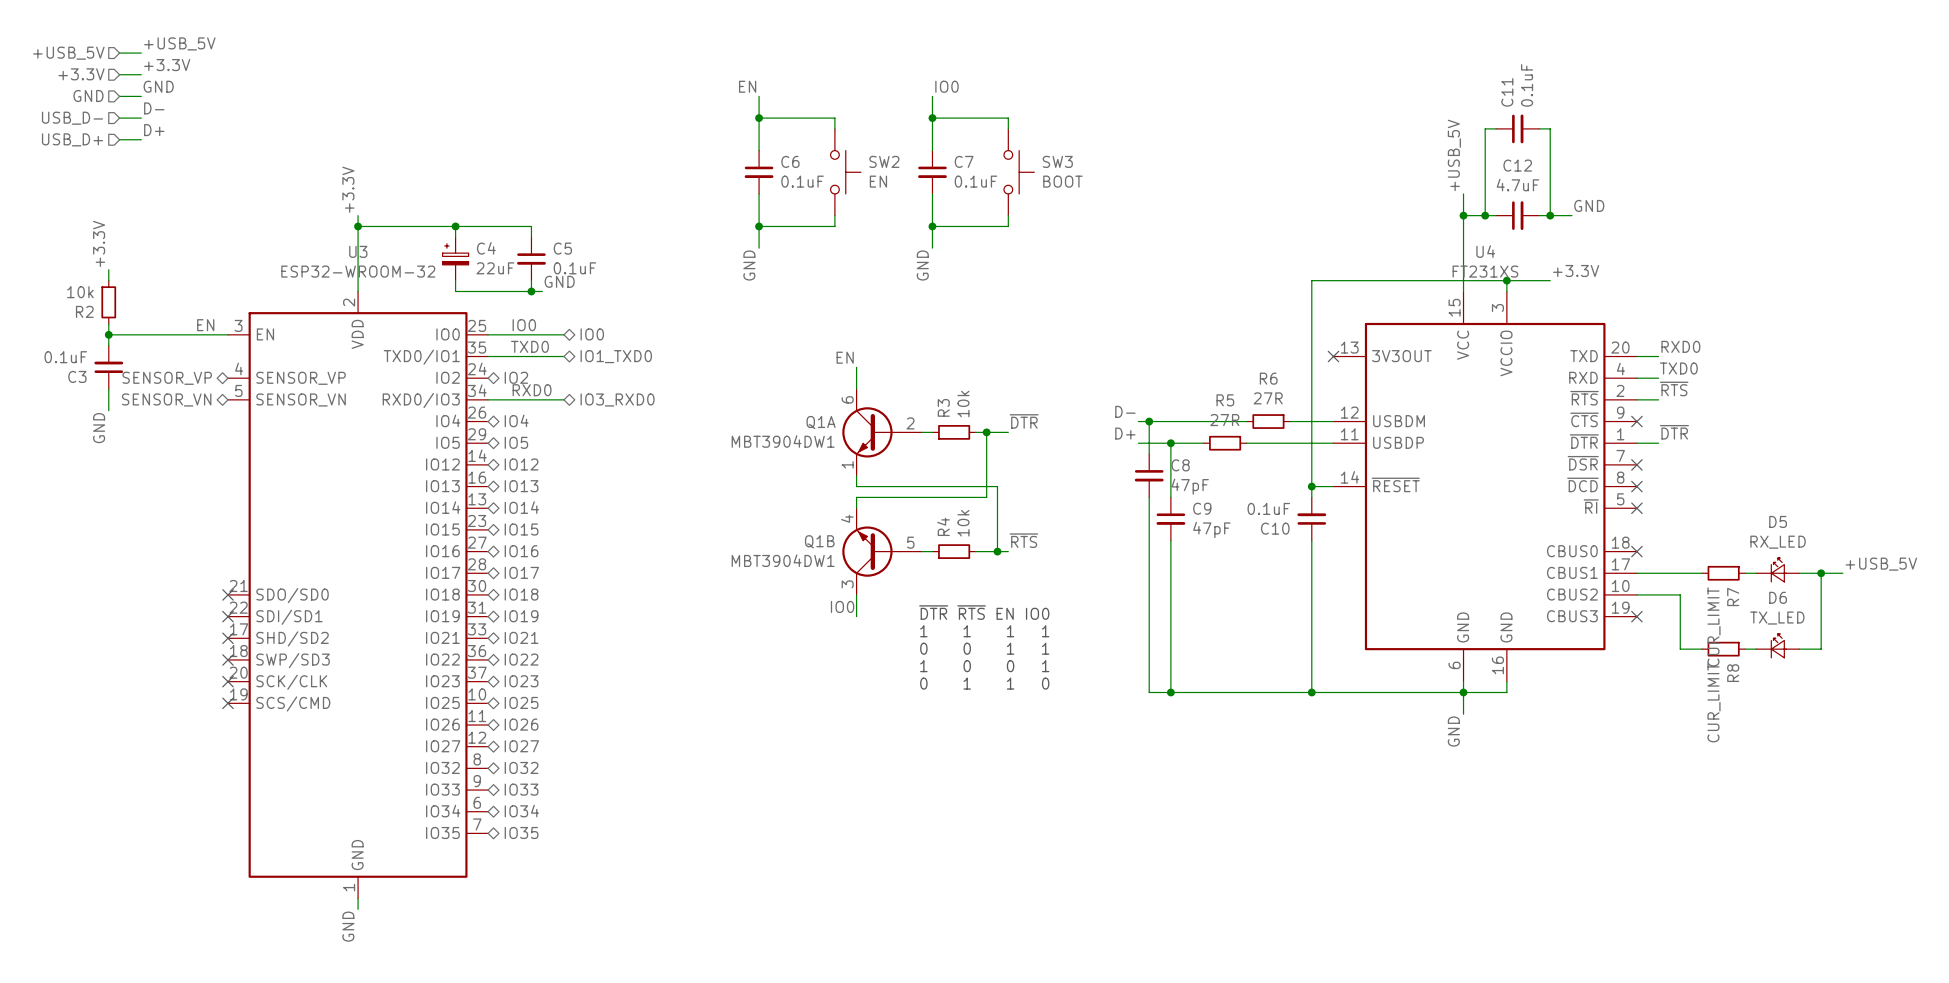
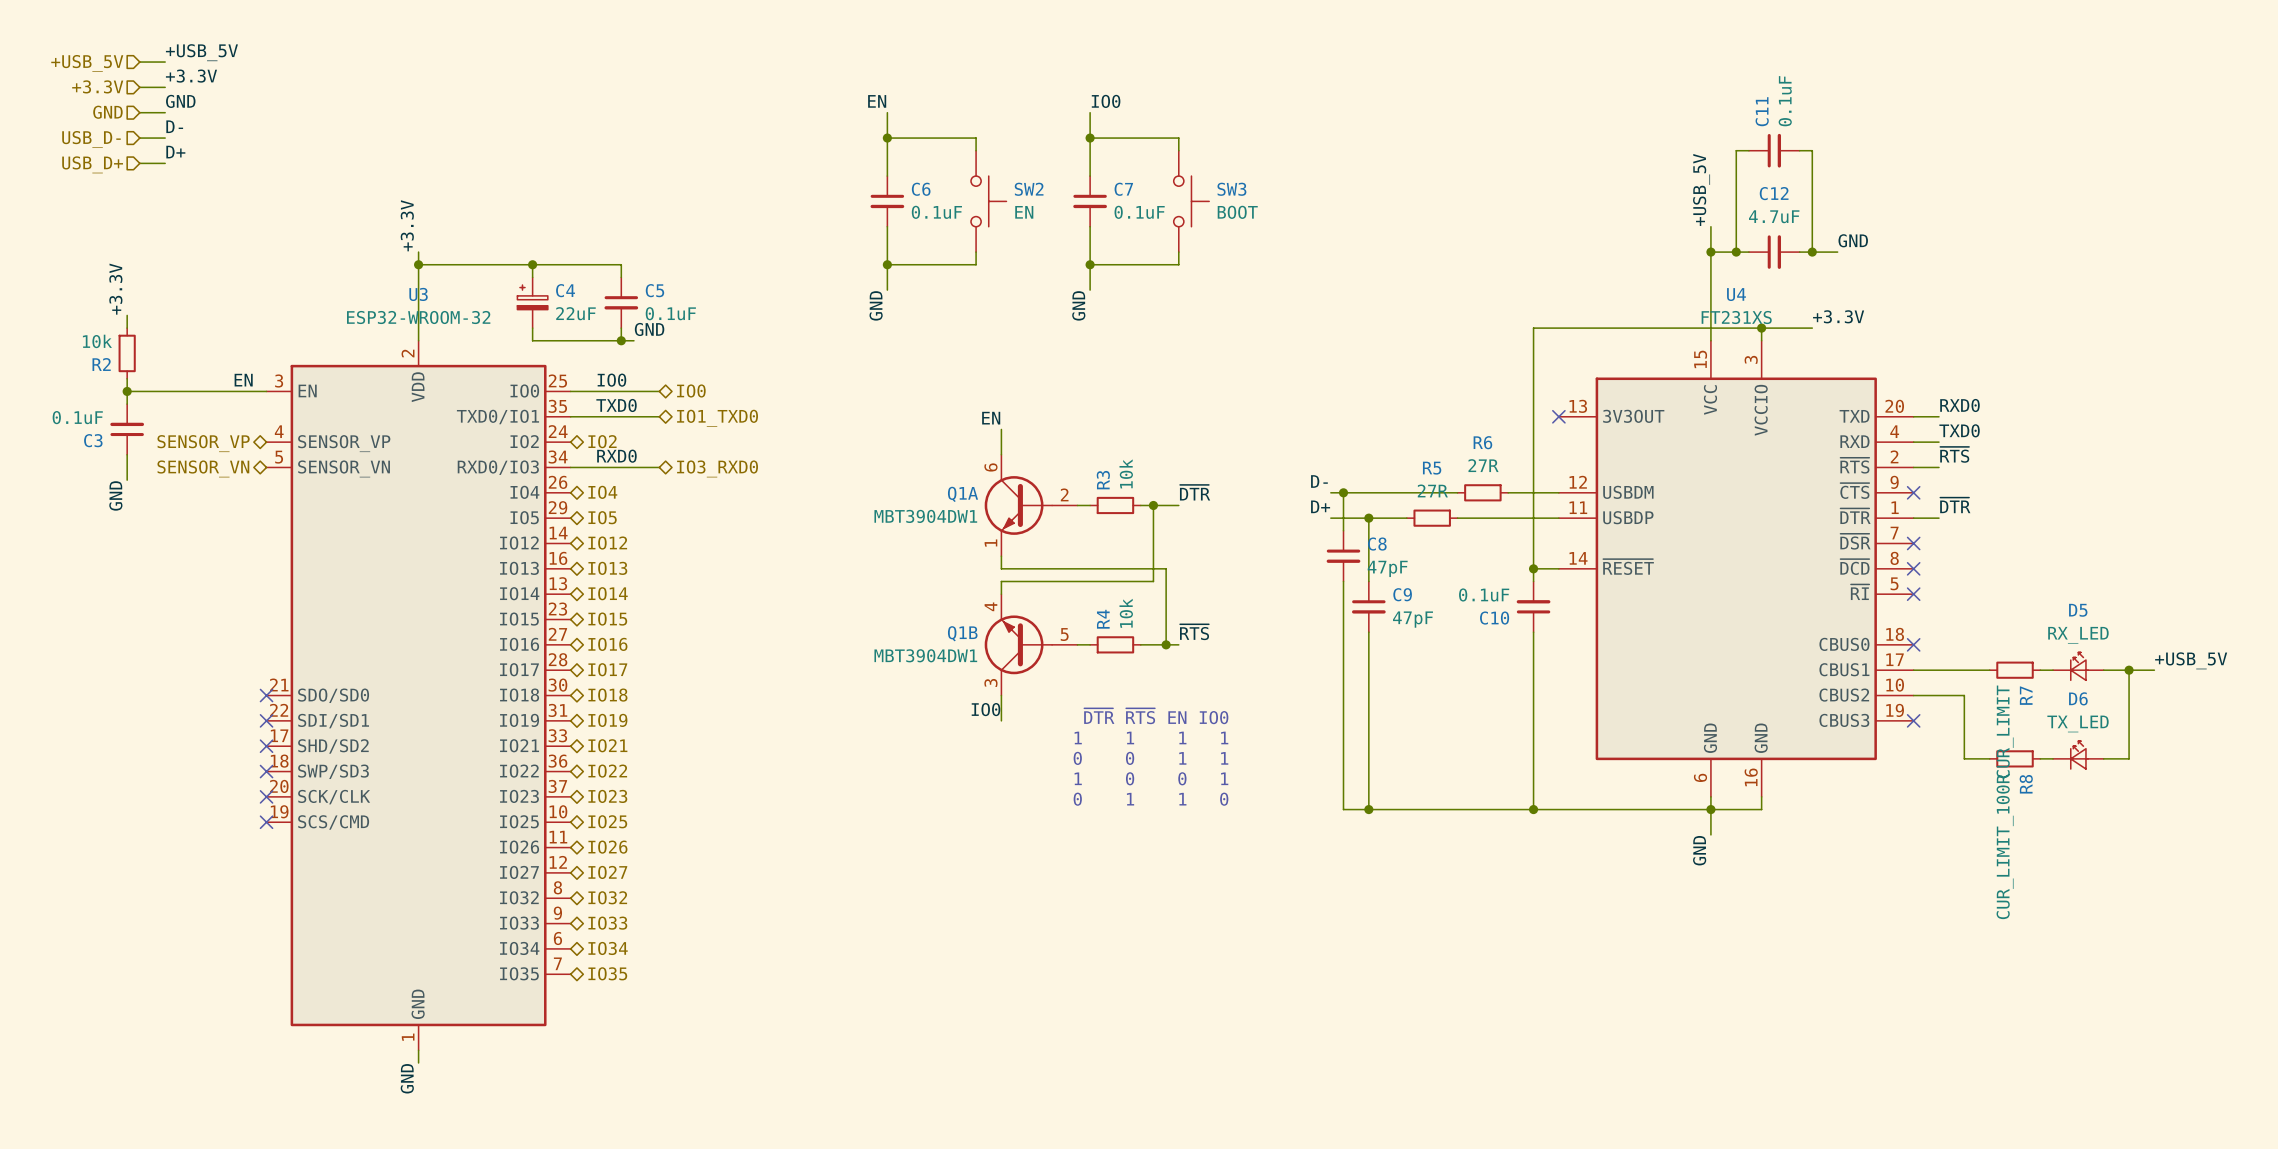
R8 value: CUR_LIMIT (1713, 702) -> CUR_LIMIT_100R (2005, 846)

